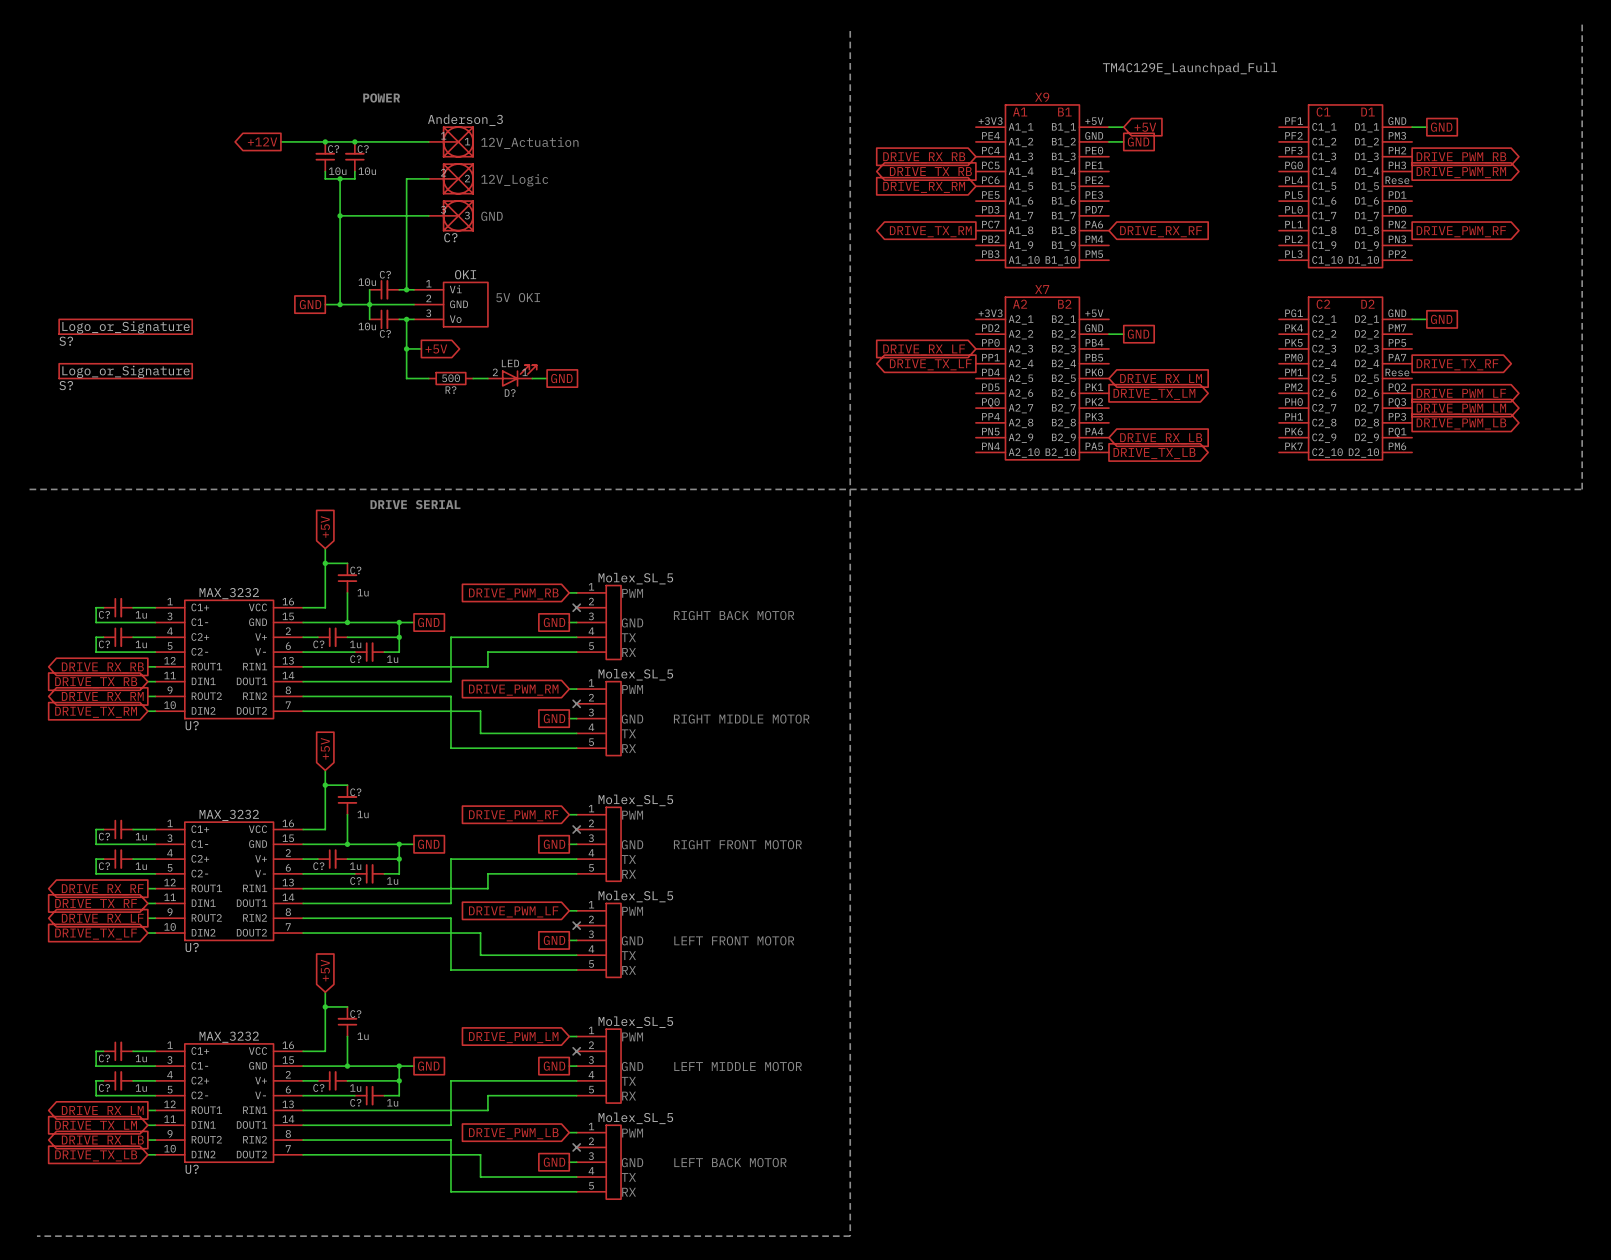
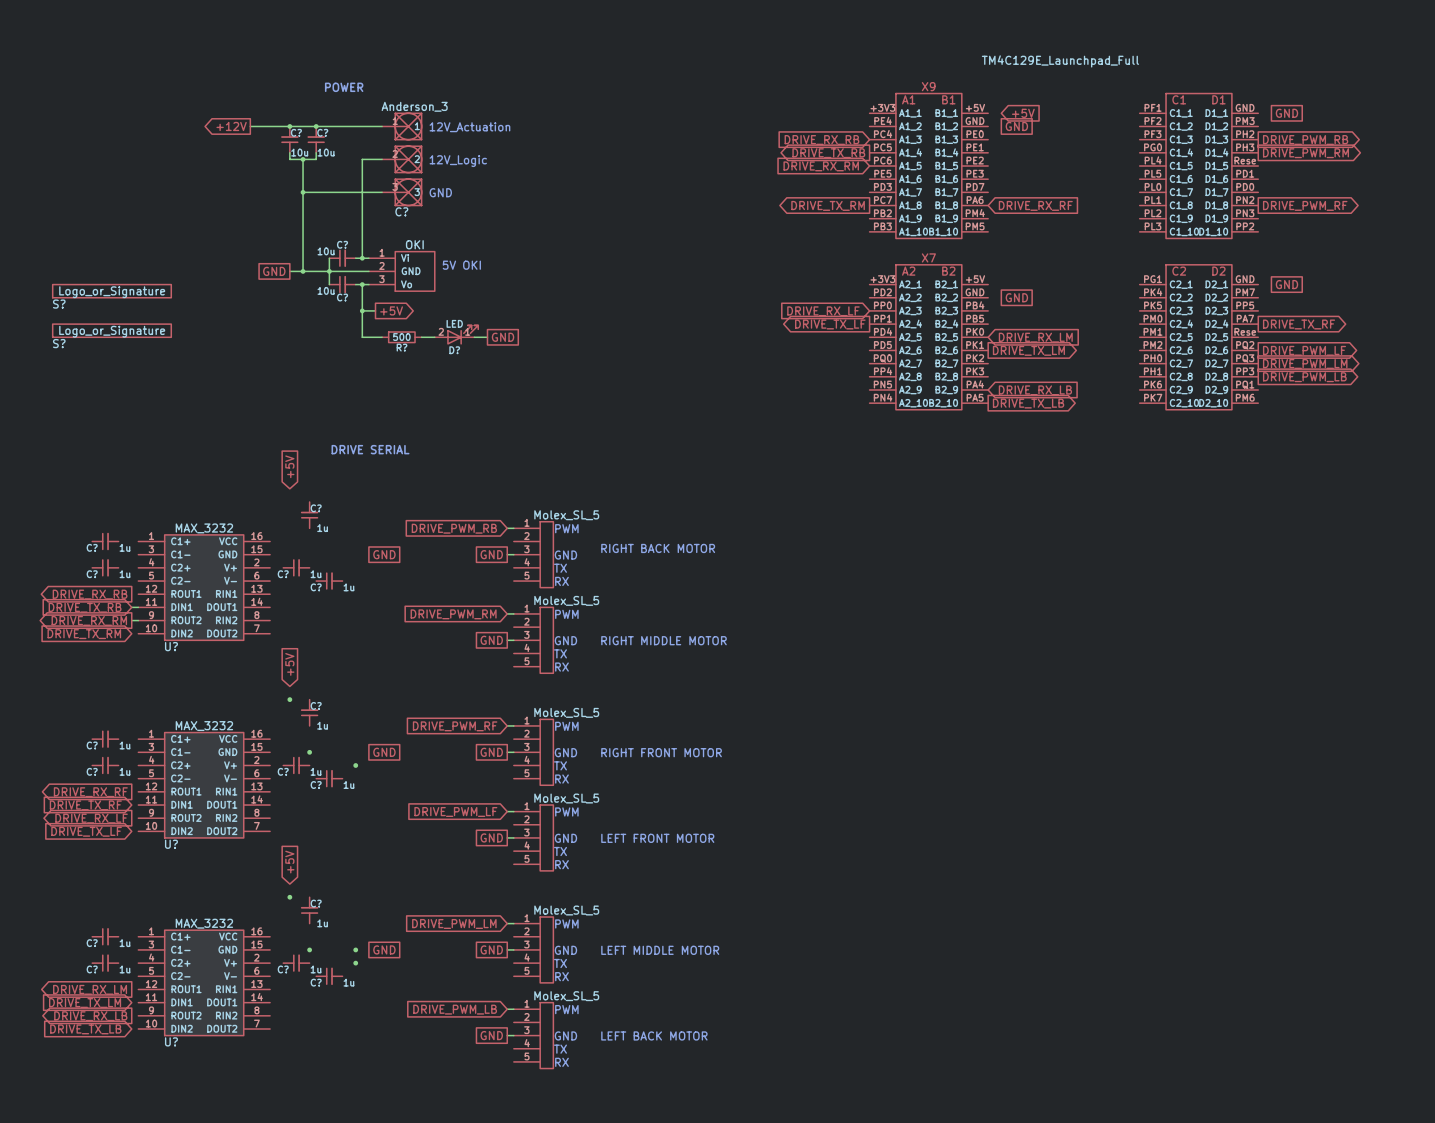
line: (1582, 23) (1582, 489) (29, 489) -> none
line: (850, 31) (850, 1236) (36, 1236) -> none
wire: (1108, 127) (1123, 127) -> none
wire: (1412, 127) (1426, 127) -> none
wire: (1108, 141) (1123, 141) -> none
wire: (1412, 319) (1426, 319) -> none
wire: (1108, 334) (1123, 334) -> none
wire: (325, 548) (325, 607) (303, 607) -> none
wire: (325, 563) (347, 563) -> none
junction: (325, 563) -> none
wire: (347, 592) (347, 622) -> none
wire: (103, 607) (96, 607) (96, 622) (155, 622) -> none
wire: (133, 607) (155, 607) -> none
no-connect mark: (576, 607) -> none
wire: (303, 622) (414, 622) -> none
junction: (347, 622) -> none
wire: (399, 622) (399, 652) (384, 652) -> none
junction: (399, 622) -> none
wire: (103, 637) (96, 637) (96, 652) (155, 652) -> none
wire: (133, 637) (155, 637) -> none
wire: (303, 637) (317, 637) -> none
wire: (347, 637) (399, 637) -> none
junction: (399, 637) -> none
wire: (576, 637) (450, 637) (450, 681) (303, 681) -> none
wire: (303, 652) (354, 652) -> none
wire: (576, 652) (487, 652) (487, 666) (303, 666) -> none
wire: (147, 666) (155, 666) -> none
wire: (303, 696) (450, 696) (450, 748) (576, 748) -> none
no-connect mark: (576, 703) -> none
wire: (147, 711) (155, 711) -> none
wire: (303, 711) (480, 711) (480, 733) (576, 733) -> none
wire: (325, 770) (325, 829) (303, 829) -> none
wire: (325, 785) (347, 785) -> none
wire: (347, 814) (347, 844) -> none
wire: (103, 829) (96, 829) (96, 844) (155, 844) -> none
wire: (133, 829) (155, 829) -> none
no-connect mark: (576, 829) -> none
wire: (303, 844) (414, 844) -> none
wire: (399, 844) (399, 873) (384, 873) -> none
junction: (399, 844) -> none
wire: (103, 859) (96, 859) (96, 873) (155, 873) -> none
wire: (133, 859) (155, 859) -> none
wire: (303, 859) (317, 859) -> none
wire: (347, 859) (399, 859) -> none
wire: (576, 859) (450, 859) (450, 903) (303, 903) -> none
wire: (303, 873) (354, 873) -> none
wire: (576, 873) (487, 873) (487, 888) (303, 888) -> none
wire: (147, 888) (155, 888) -> none
wire: (147, 903) (155, 903) -> none
wire: (147, 918) (155, 918) -> none
wire: (303, 918) (450, 918) (450, 969) (576, 969) -> none
no-connect mark: (576, 925) -> none
wire: (147, 933) (155, 933) -> none
wire: (303, 933) (480, 933) (480, 955) (576, 955) -> none
wire: (325, 992) (325, 1051) (303, 1051) -> none
wire: (325, 1006) (347, 1006) -> none
wire: (347, 1036) (347, 1066) -> none
wire: (103, 1051) (96, 1051) (96, 1066) (155, 1066) -> none
wire: (133, 1051) (155, 1051) -> none
no-connect mark: (576, 1051) -> none
wire: (303, 1066) (414, 1066) -> none
wire: (399, 1066) (399, 1095) (384, 1095) -> none
wire: (103, 1080) (96, 1080) (96, 1095) (155, 1095) -> none
wire: (133, 1080) (155, 1080) -> none
wire: (303, 1080) (317, 1080) -> none
wire: (347, 1080) (399, 1080) -> none
wire: (576, 1080) (450, 1080) (450, 1125) (303, 1125) -> none
wire: (303, 1095) (354, 1095) -> none
wire: (576, 1095) (487, 1095) (487, 1110) (303, 1110) -> none
wire: (147, 1110) (155, 1110) -> none
wire: (147, 1125) (155, 1125) -> none
wire: (147, 1140) (155, 1140) -> none
wire: (303, 1140) (450, 1140) (450, 1191) (576, 1191) -> none
no-connect mark: (576, 1147) -> none
wire: (147, 1154) (155, 1154) -> none
wire: (303, 1154) (480, 1154) (480, 1177) (576, 1177) -> none

